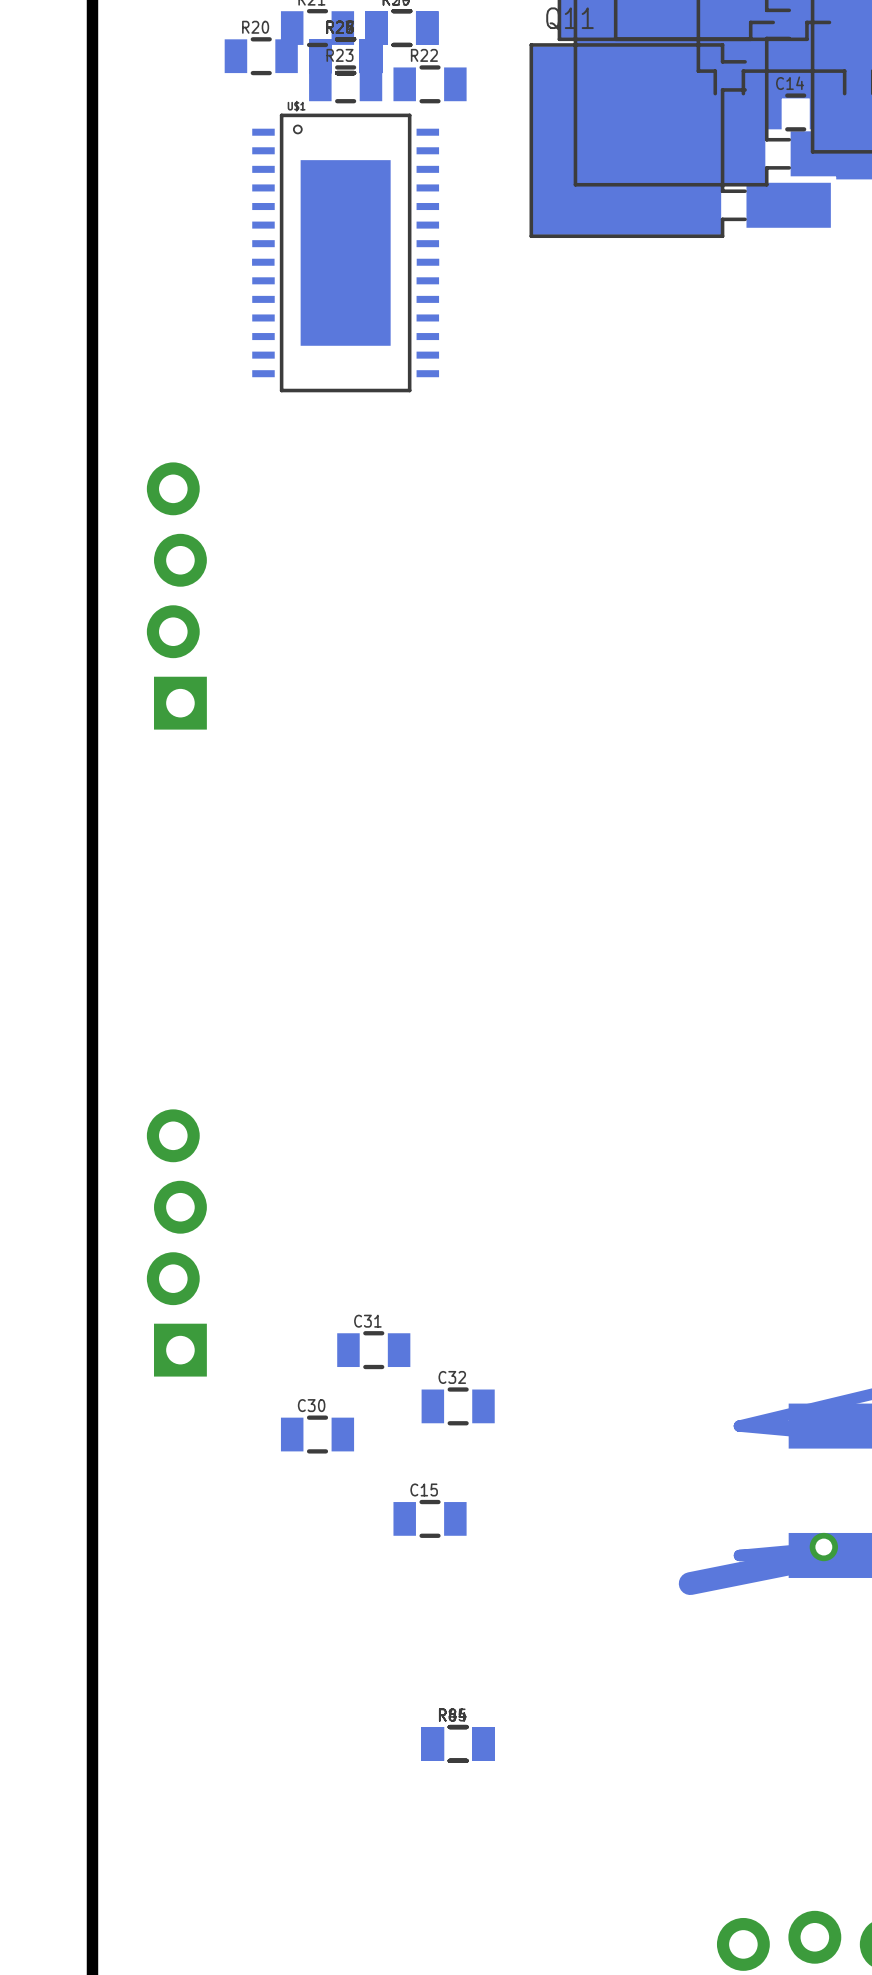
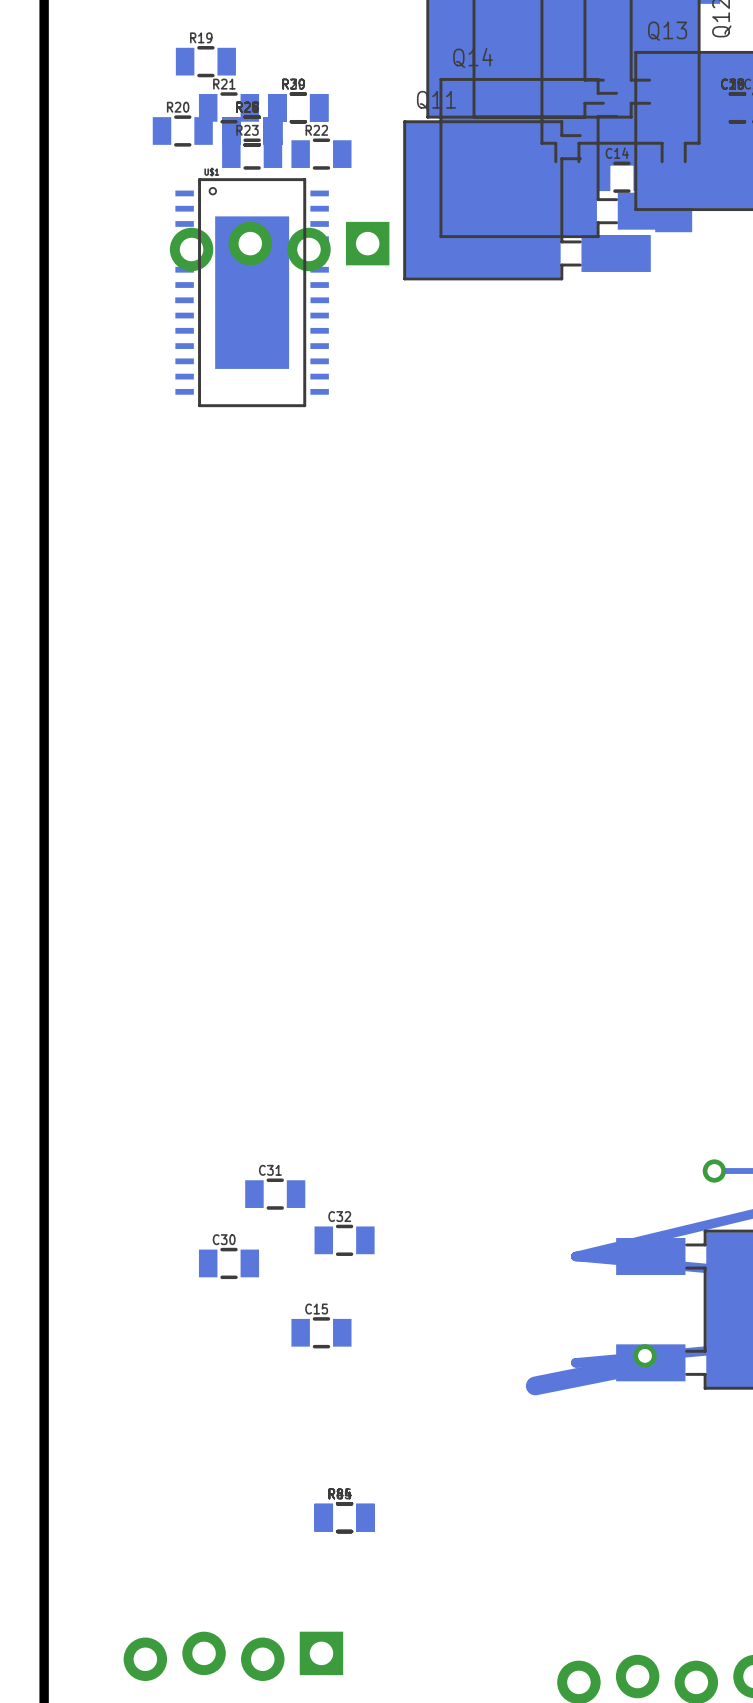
part rotation: 0° (176, 595) -> 90° counterclockwise (279, 246)
part position: (176, 595) -> (279, 246)
part: (176, 1242) -> none
part: none -> (233, 1656)

